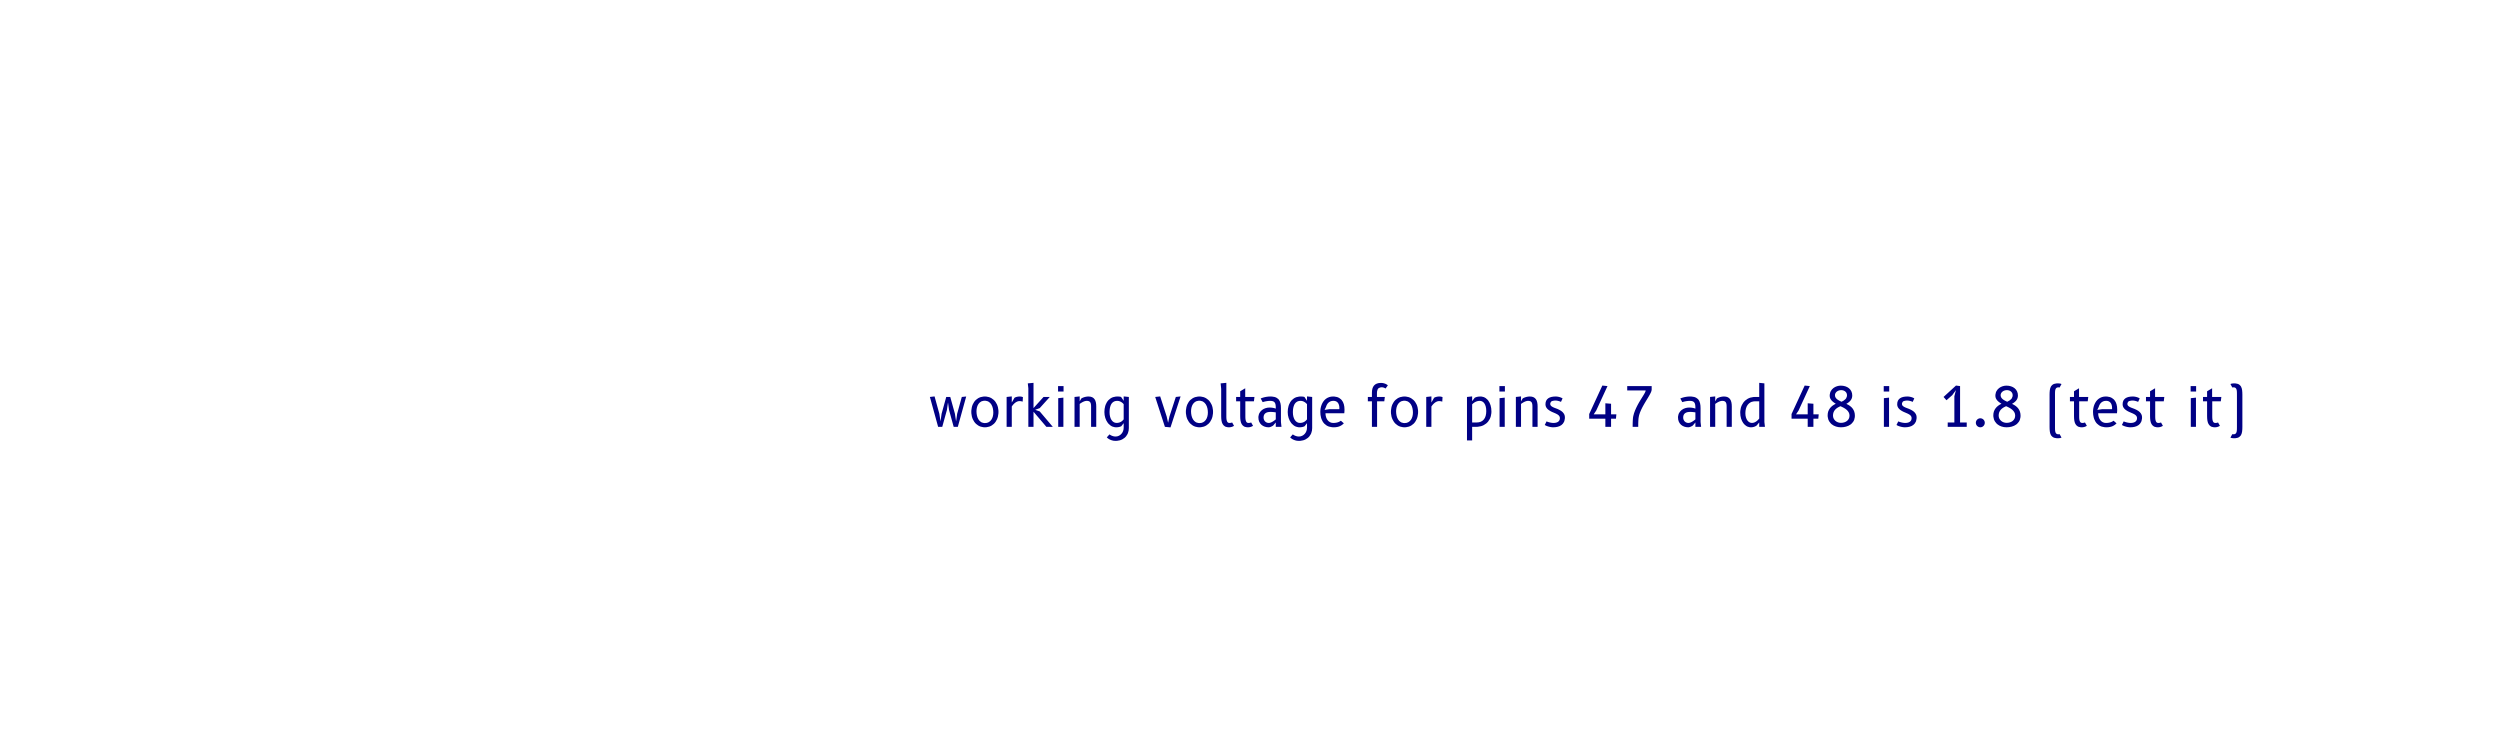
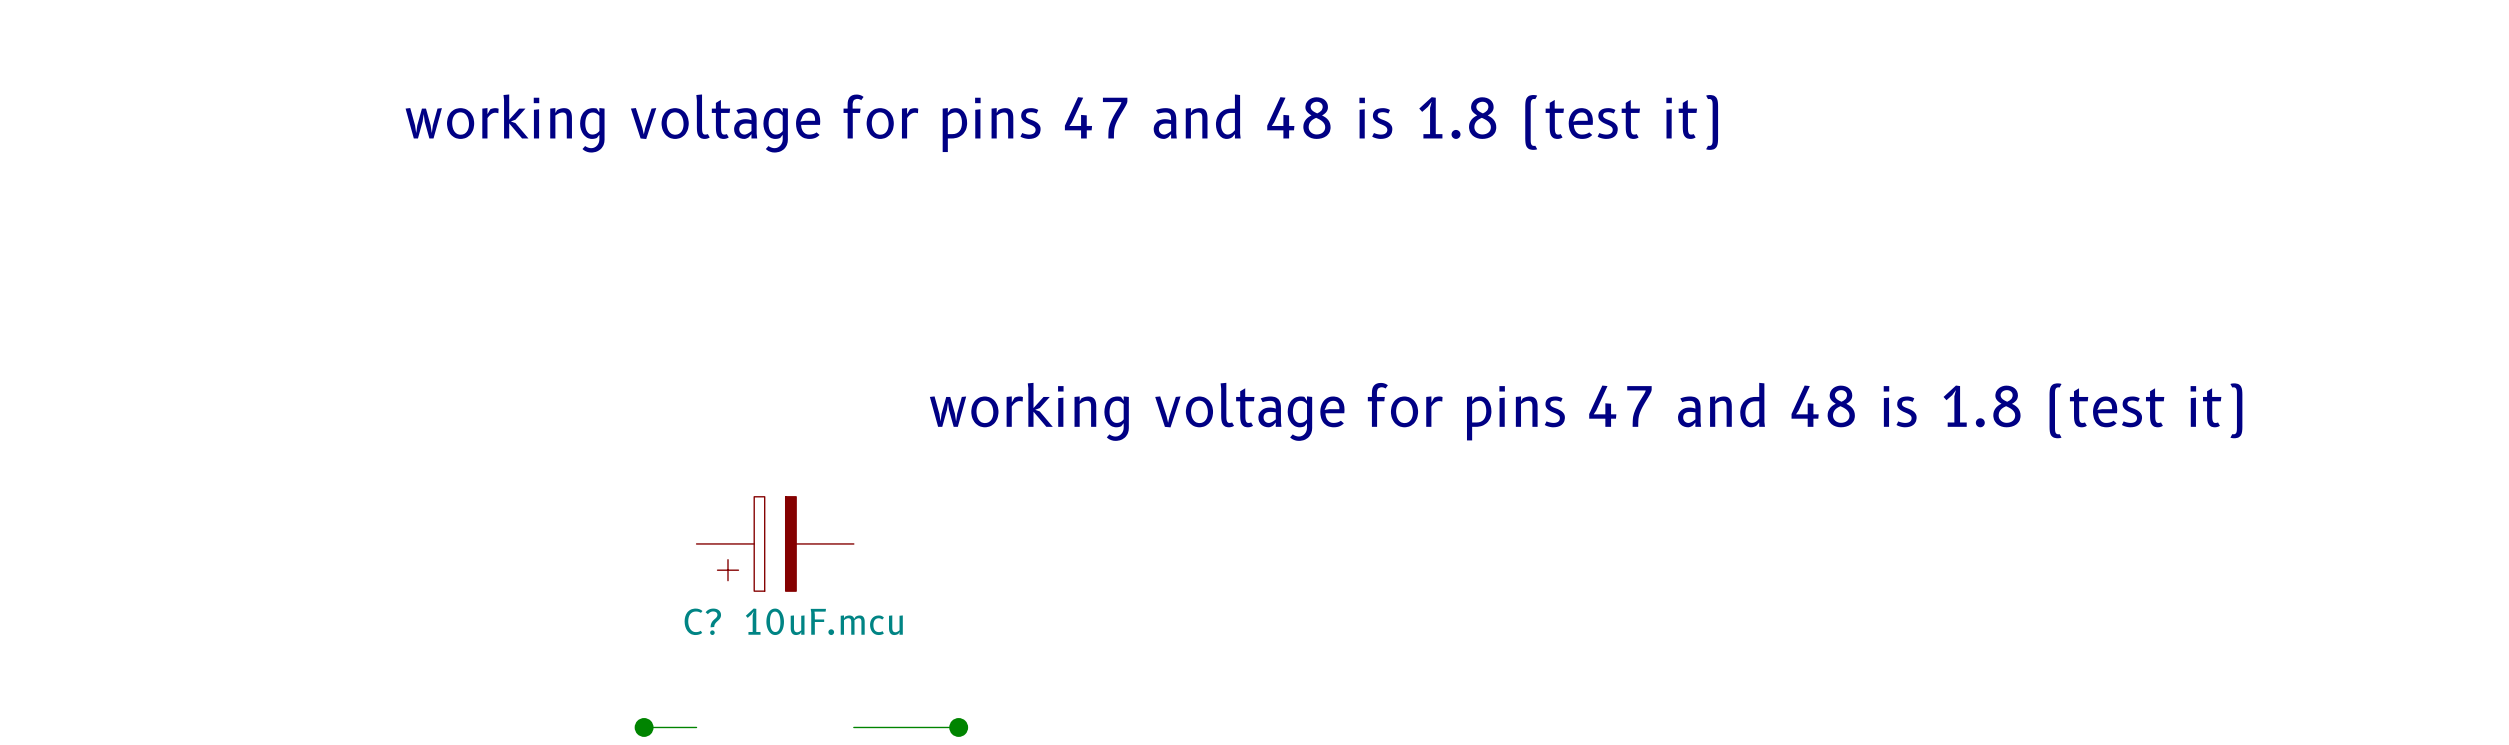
text: none -> working voltage for pins 47 and 48 is 1.8 (test it) (1061, 123)
C?: none -> 10uF.mcu (775, 543)
wire: none -> (644, 727) (696, 727)
junction: none -> (644, 727)
wire: none -> (853, 727) (958, 727)
junction: none -> (958, 727)

